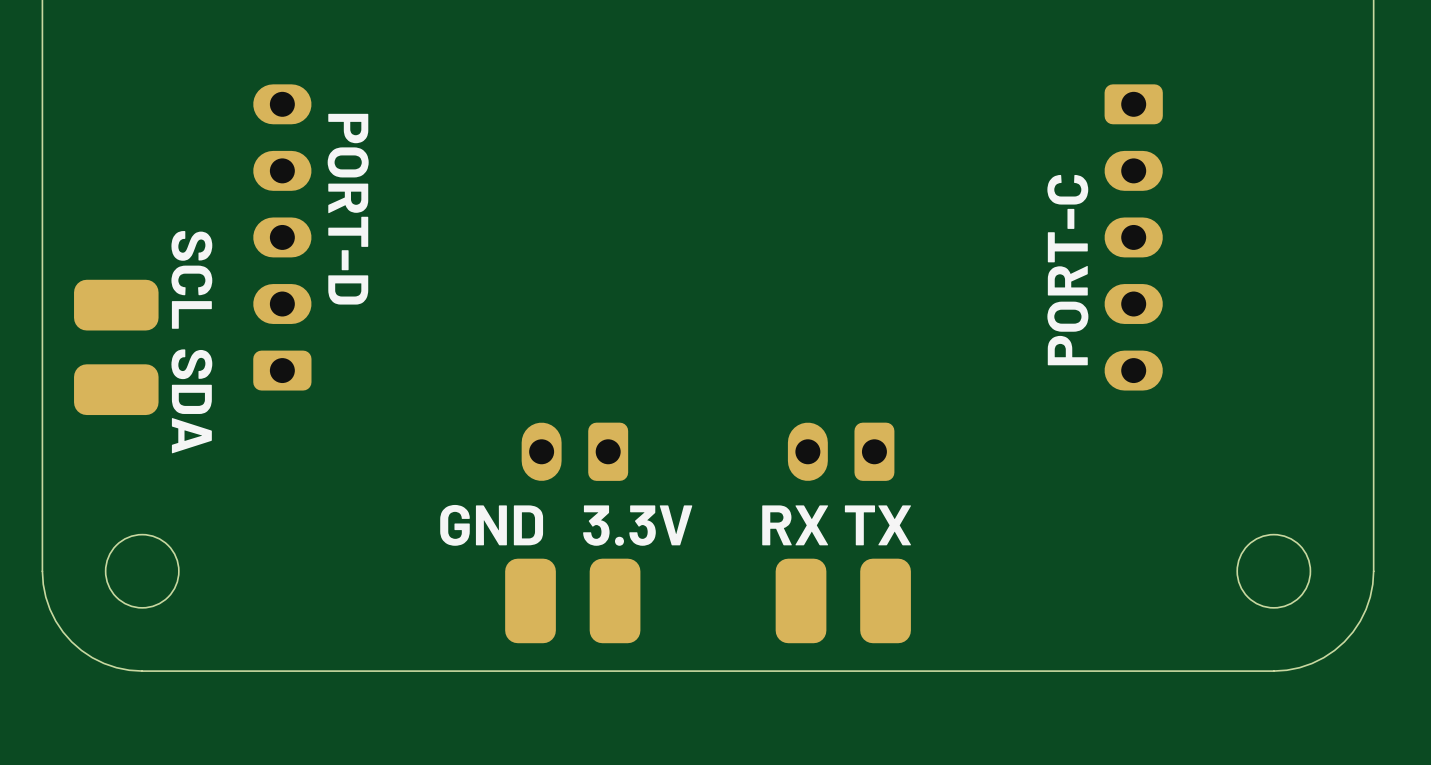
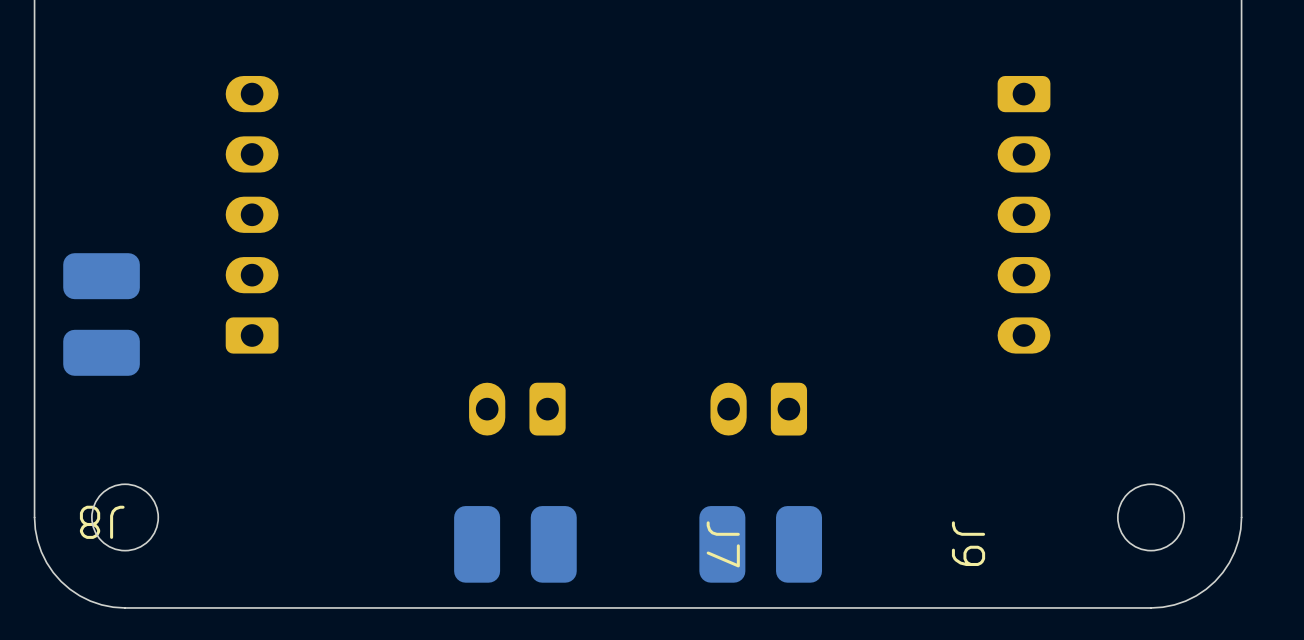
text: PORT-D (348, 209) -> none
text: PORT-C (1067, 270) -> none
text: SCL (191, 279) -> none
text: SDA (191, 401) -> none
text: GND (491, 525) -> none
text: 3.3V (637, 525) -> none
text: RX (795, 525) -> none
text: TX (877, 525) -> none
J8 name: none -> J8 (102, 522)
J9 name: none -> J9 (968, 543)
J7 name: none -> J7 (723, 544)

